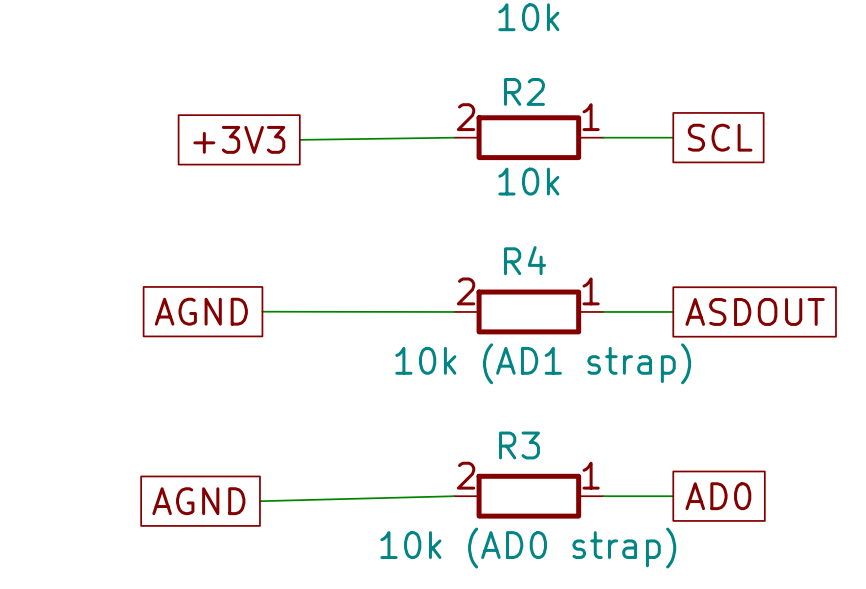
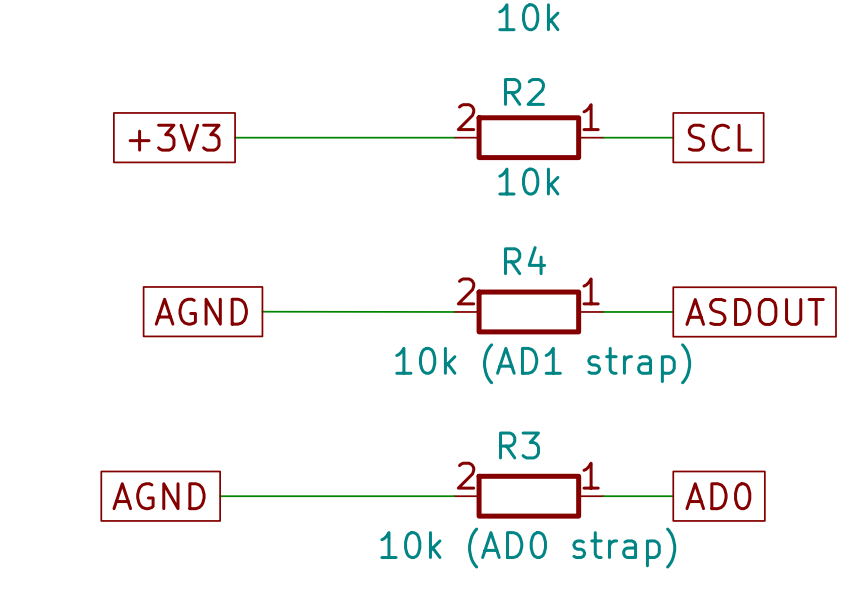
wire: (454, 137) (299, 139) -> (454, 137) (235, 137)
global label position: +3V3 (239, 139) -> +3V3 (174, 137)
wire: (454, 496) (259, 501) -> (454, 496) (220, 496)
global label position: AGND (198, 501) -> AGND (159, 496)

